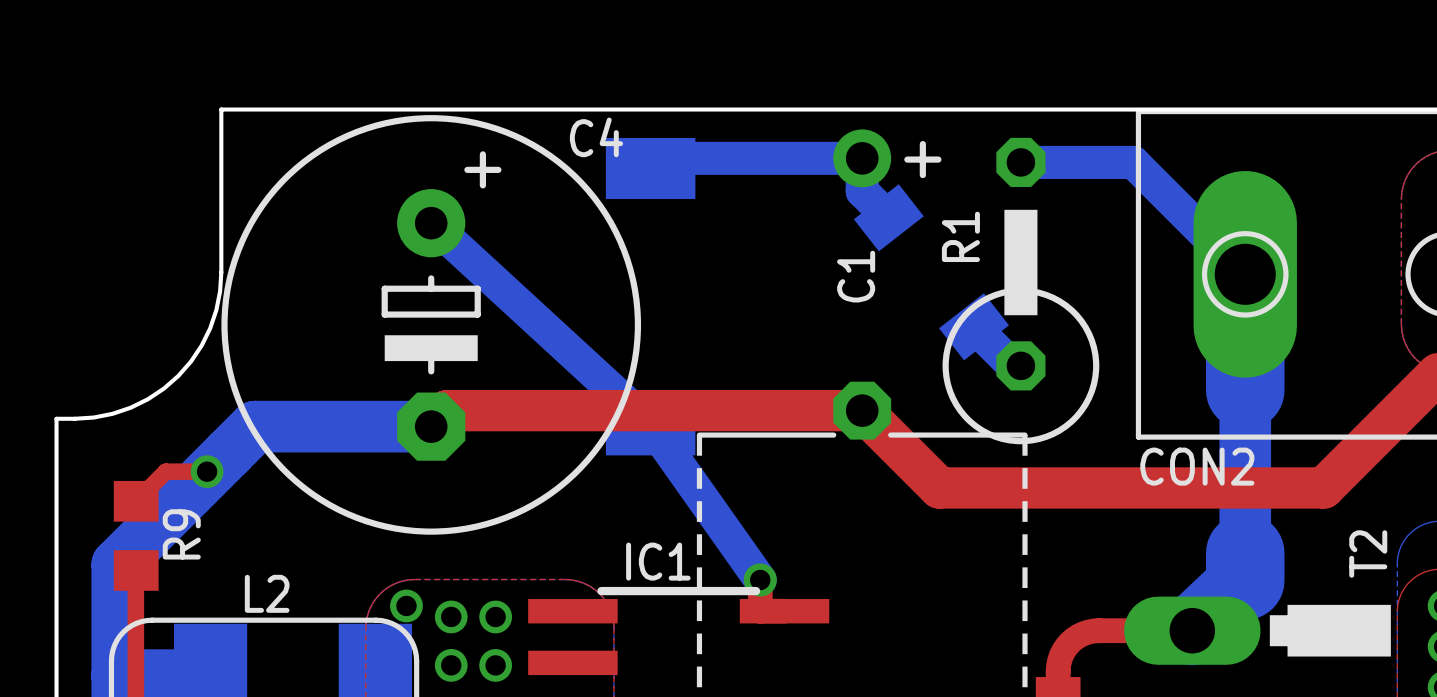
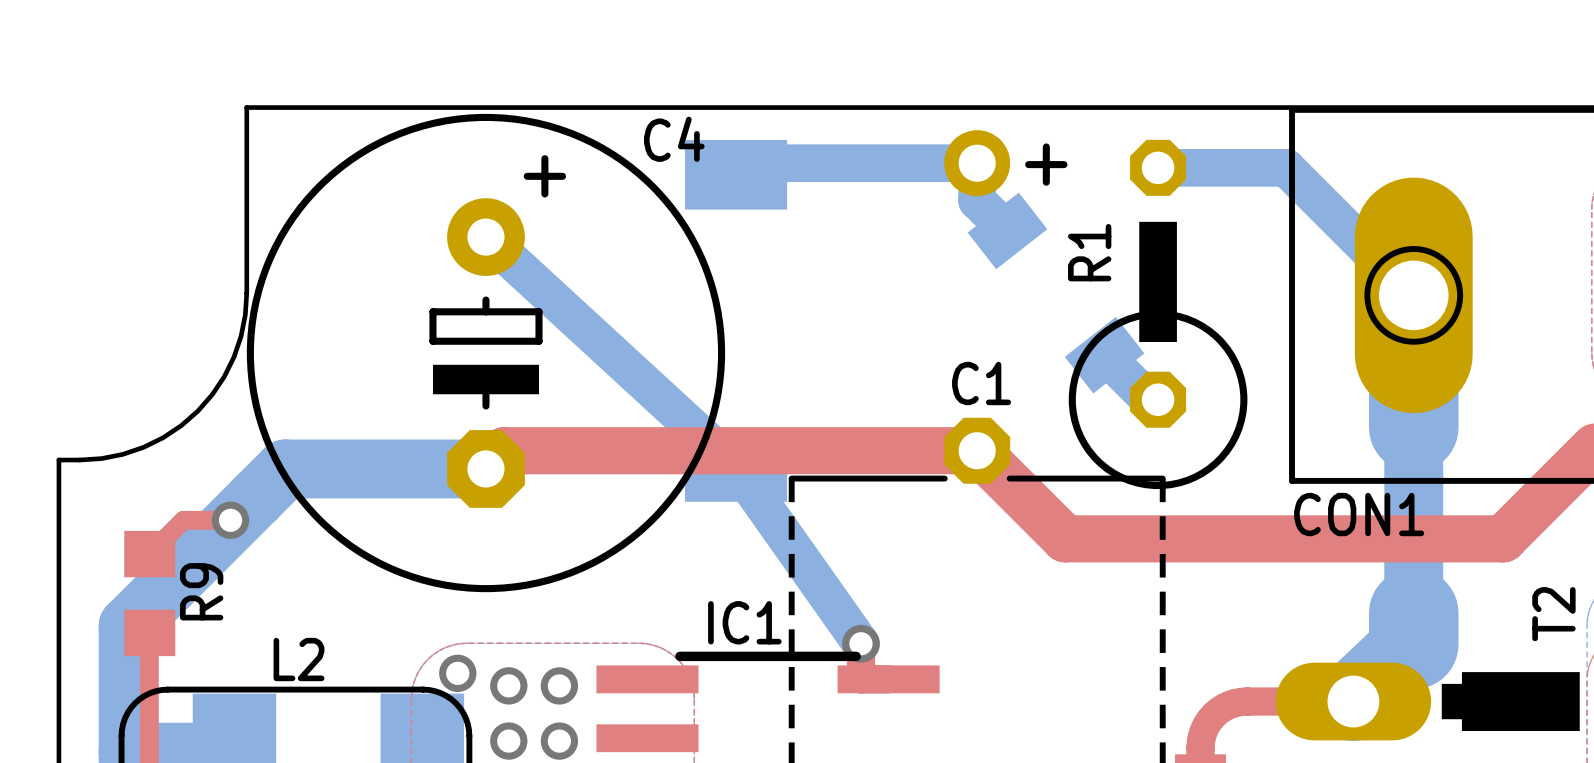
C1 name rotation: 0° (856, 276) -> 90° clockwise (981, 383)
C1 name position: C1 (856, 276) -> C1 (981, 383)
CON2 name: CON2 (1197, 466) -> CON1 (1359, 514)

